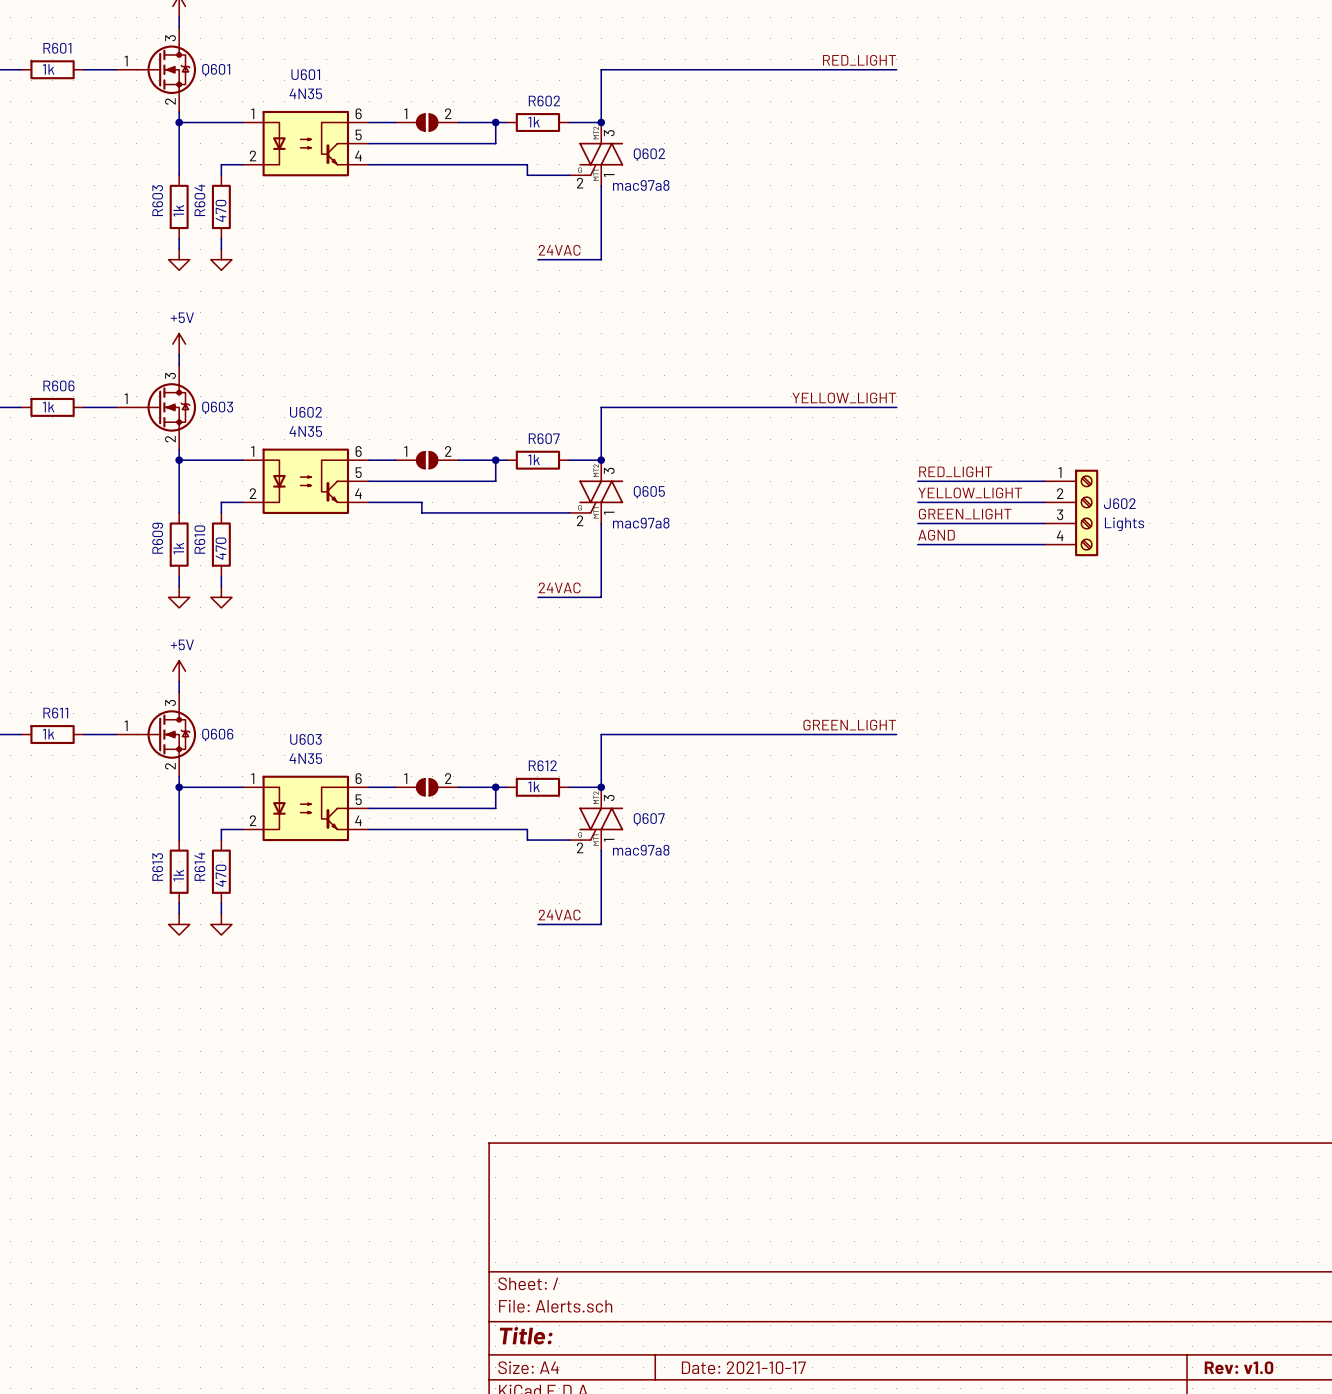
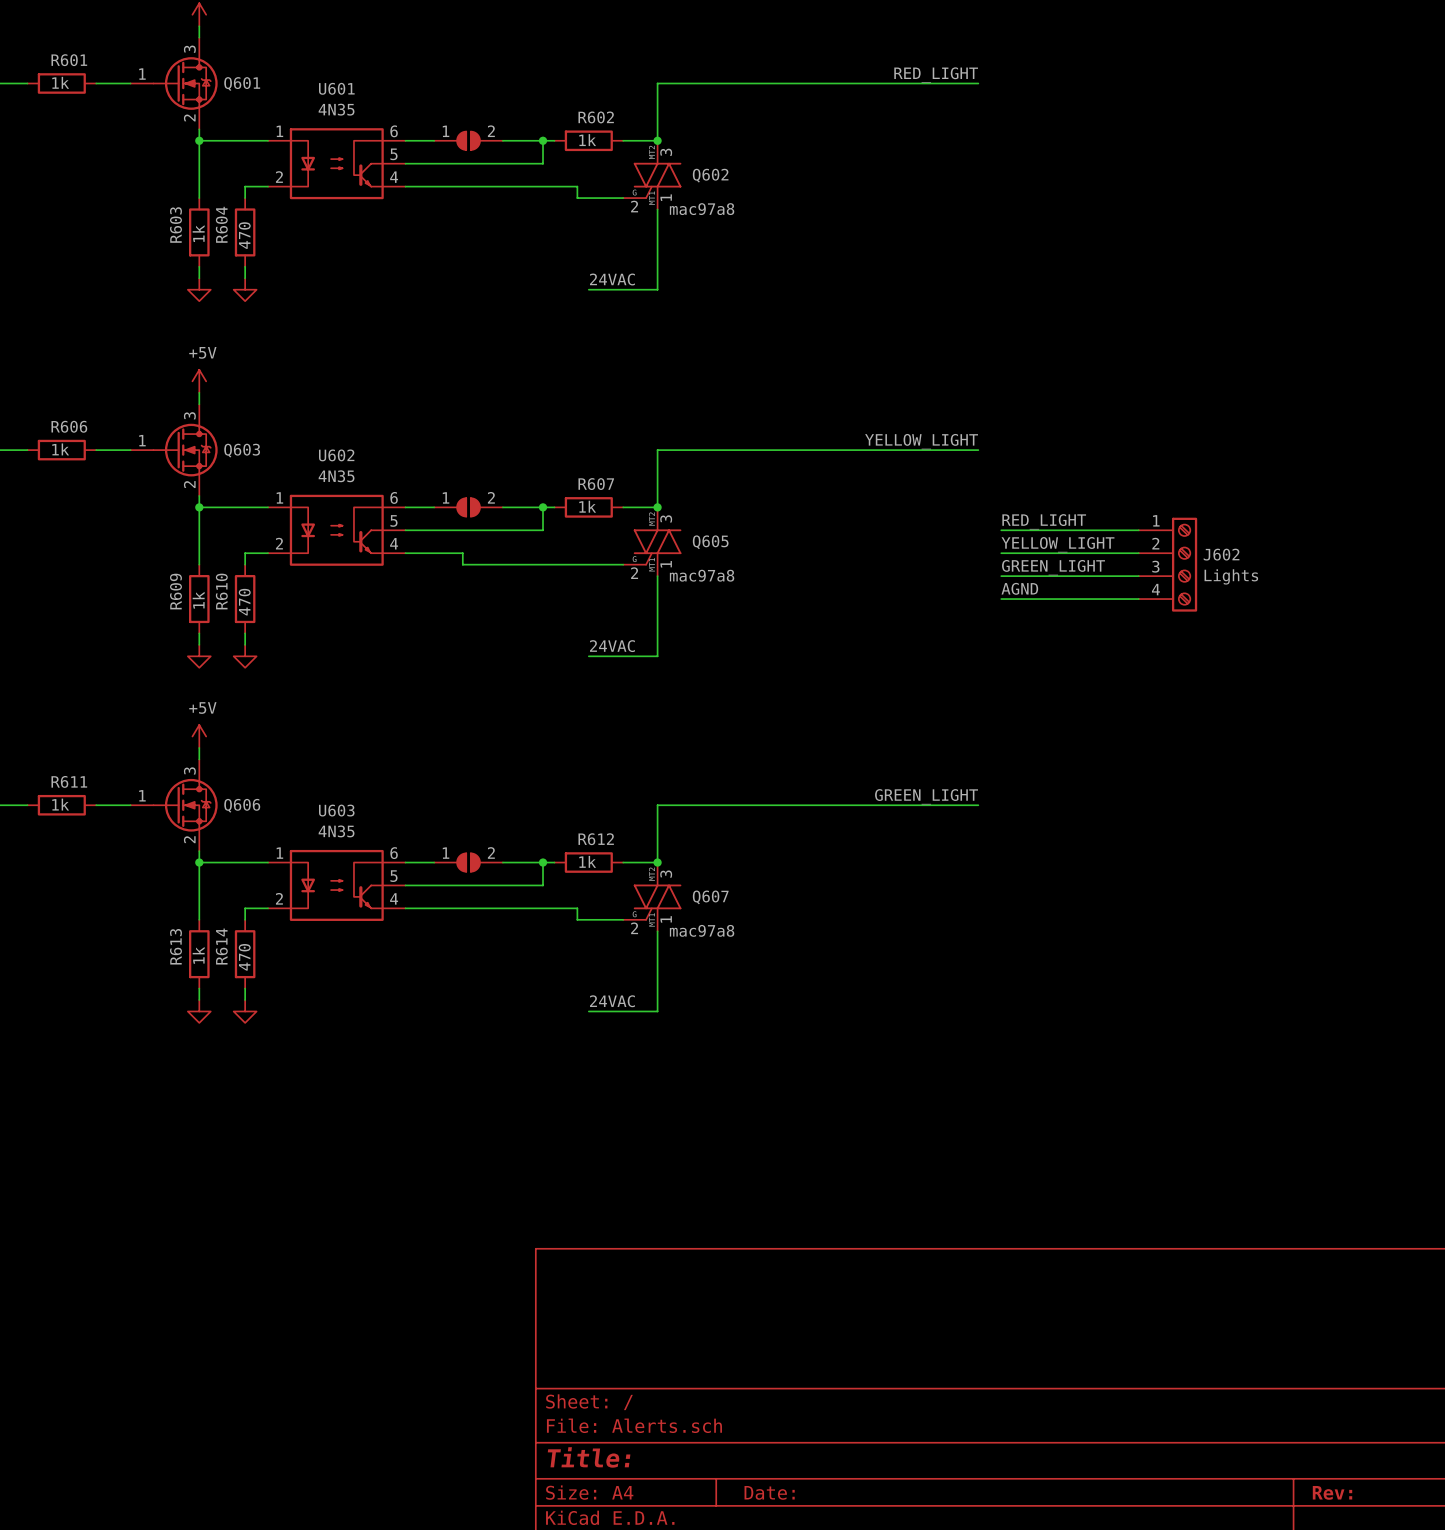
title block: Date: 2021-10-17 (743, 1367) -> Date: (769, 1492)
title block: Rev: v1.0 (1239, 1367) -> Rev: (1332, 1492)

